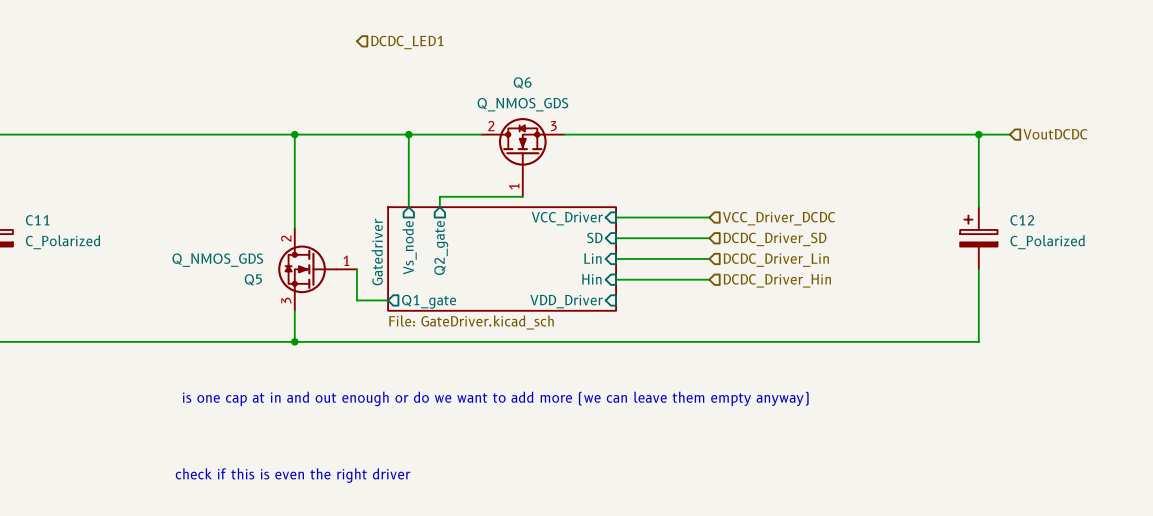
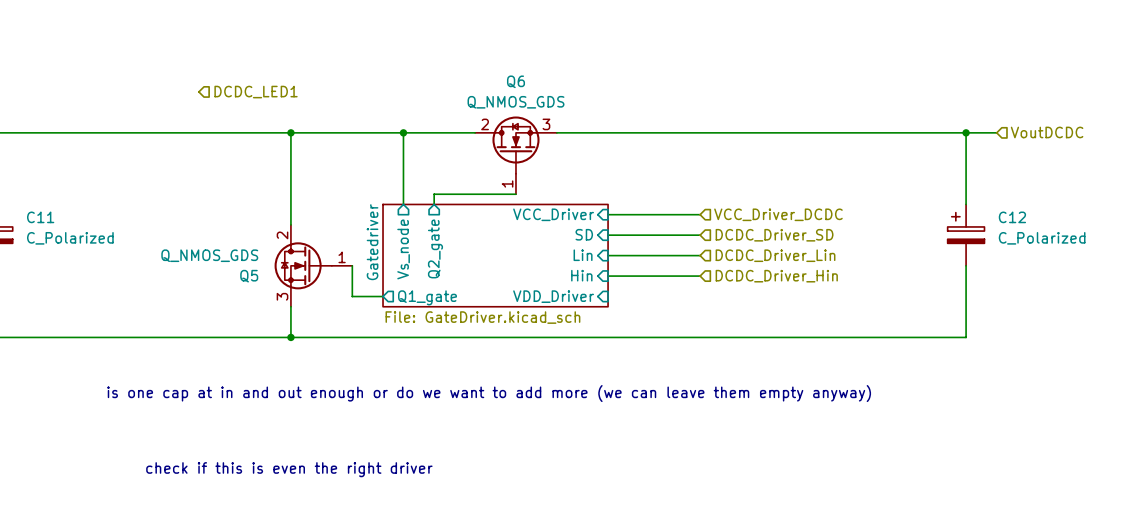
hierarchical label position: DCDC_LED1 (407, 42) -> DCDC_LED1 (256, 92)

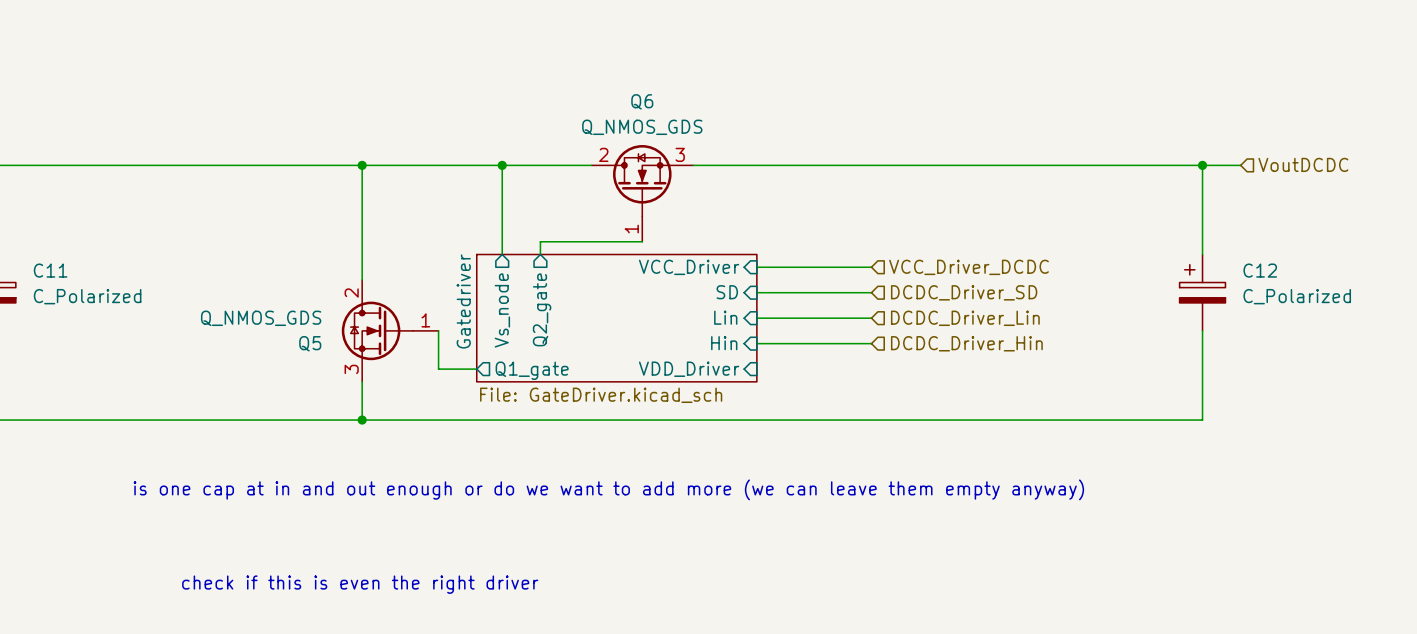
hierarchical label: DCDC_LED1 (256, 92) -> none

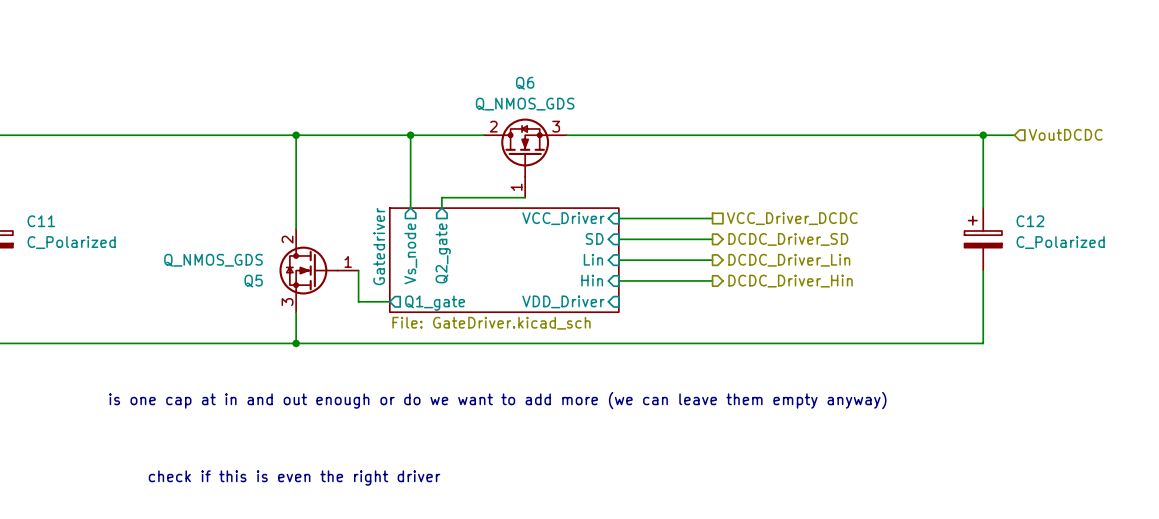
hierarchical label shape: input (968, 267) -> passive (792, 218)
hierarchical label shape: input (964, 292) -> output (788, 239)
hierarchical label shape: input (965, 318) -> output (789, 260)
hierarchical label shape: input (966, 343) -> output (790, 281)

